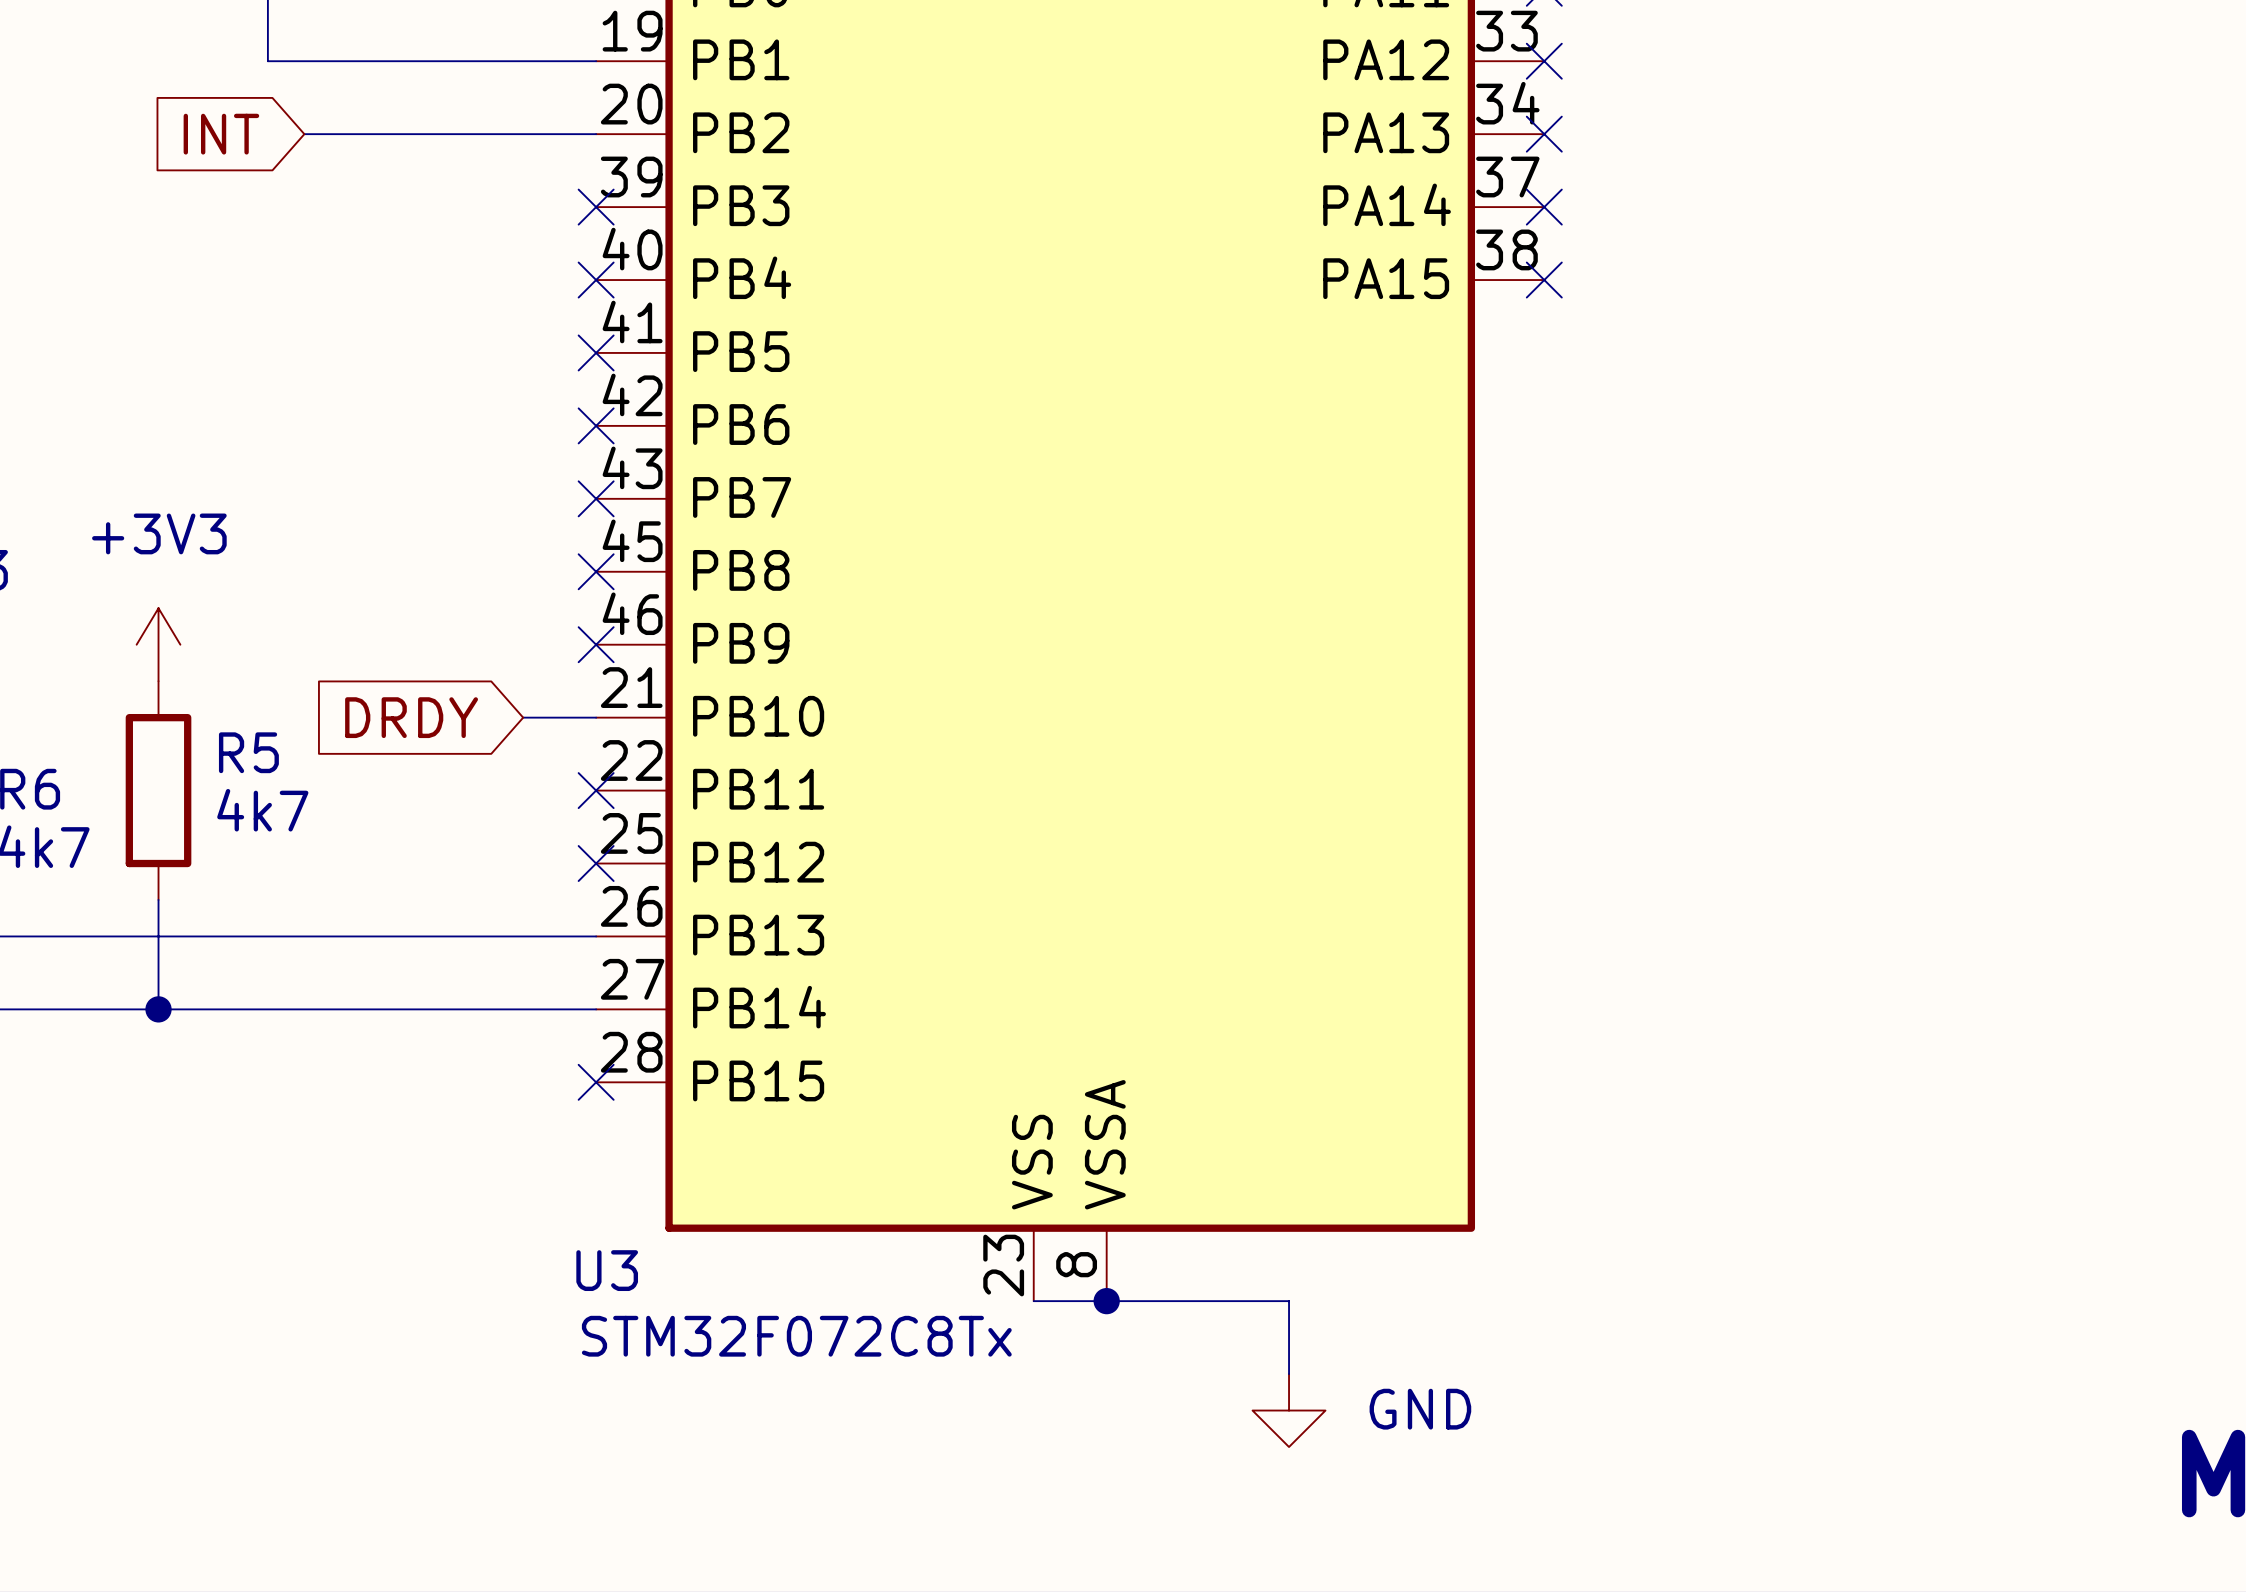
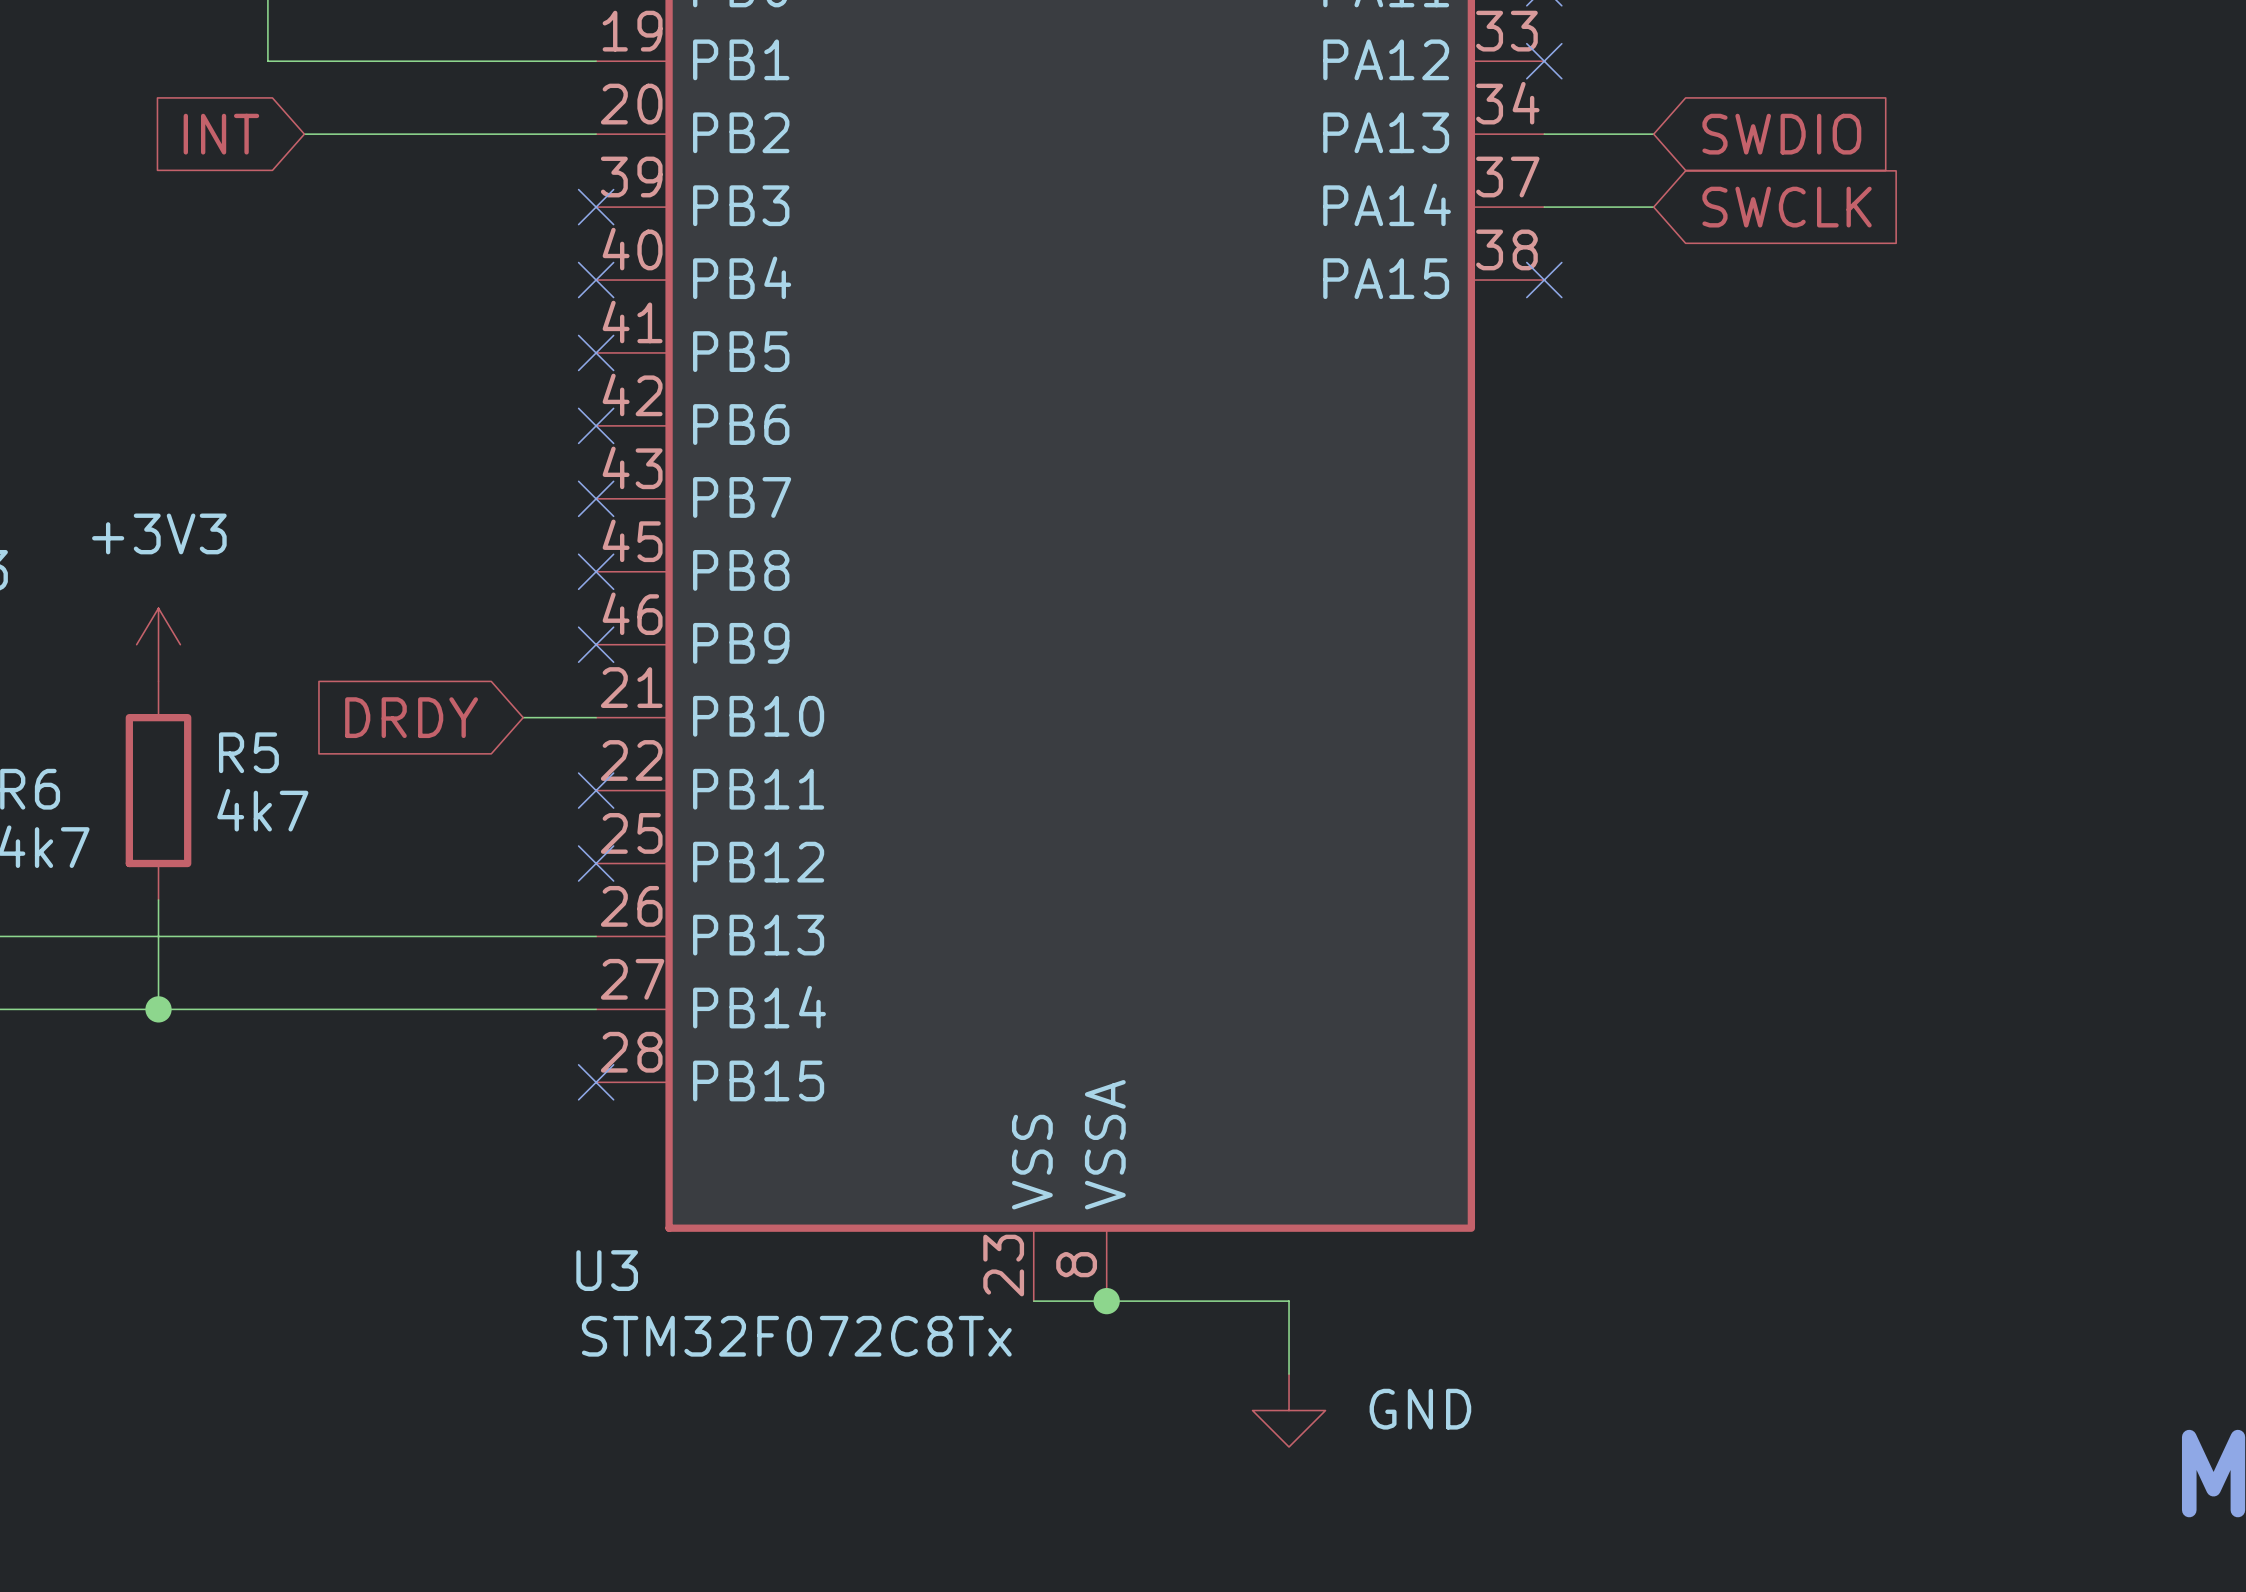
wire: none -> (1544, 134) (1653, 134)
no-connect mark: (1544, 134) -> none
global label: none -> SWDIO (1781, 134)
wire: none -> (1544, 207) (1653, 207)
no-connect mark: (1544, 207) -> none
global label: none -> SWCLK (1787, 207)

